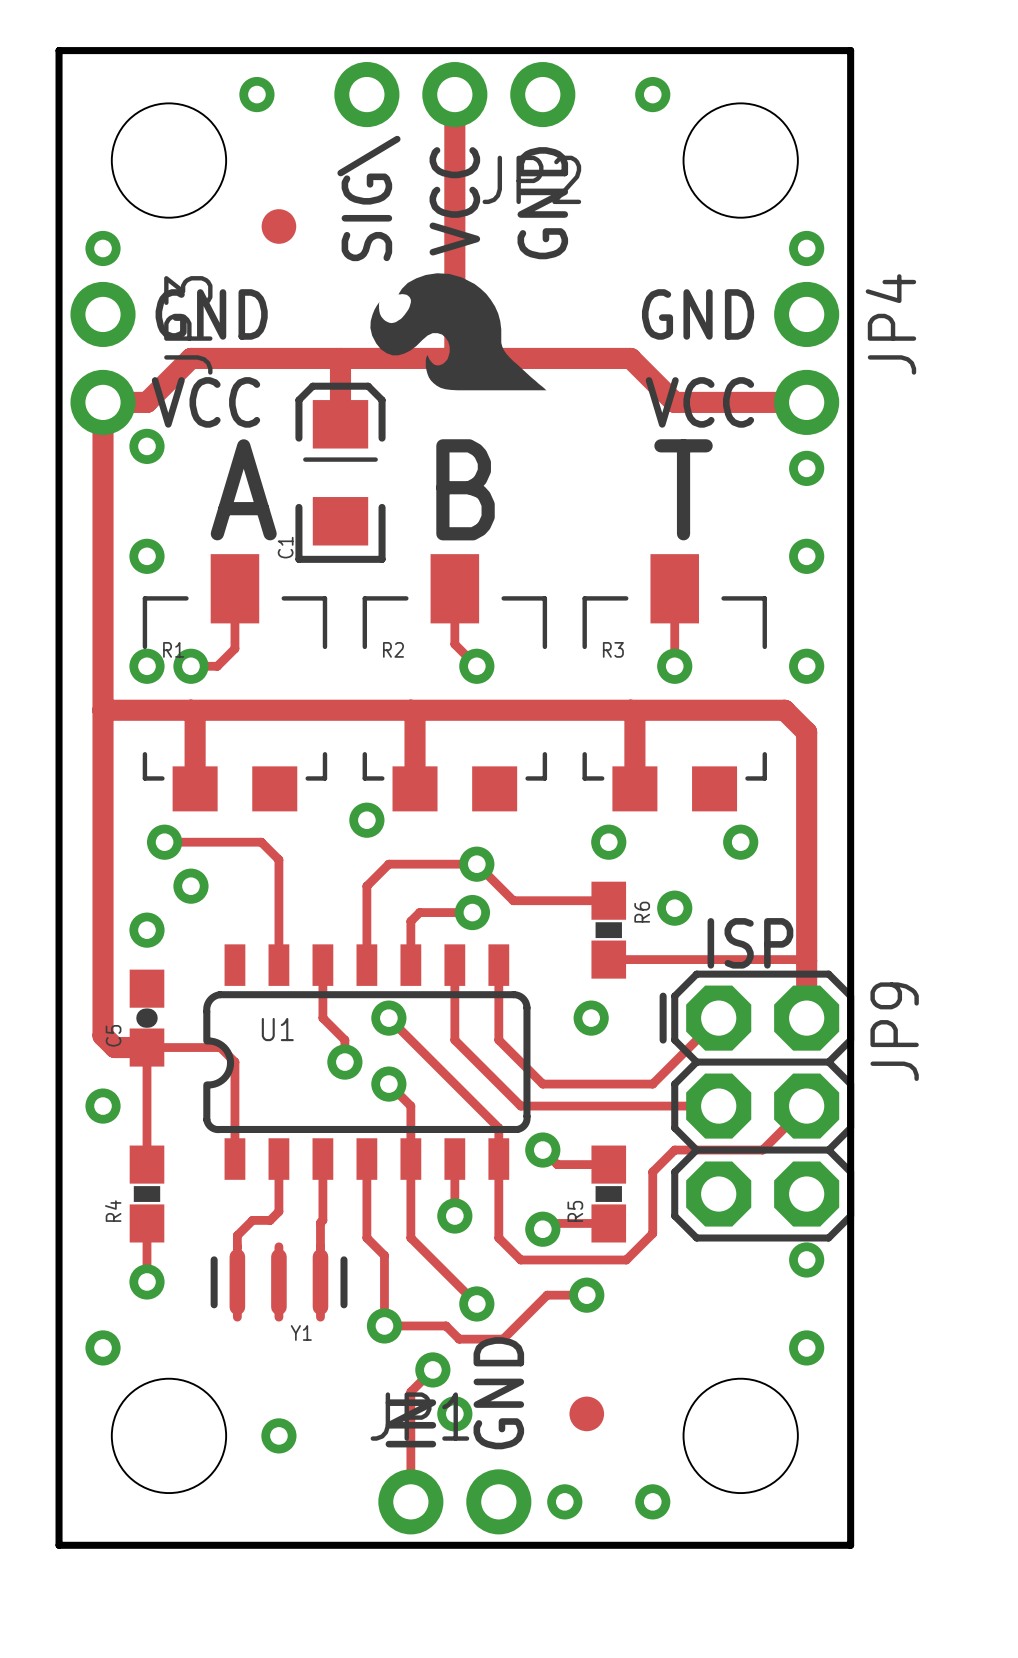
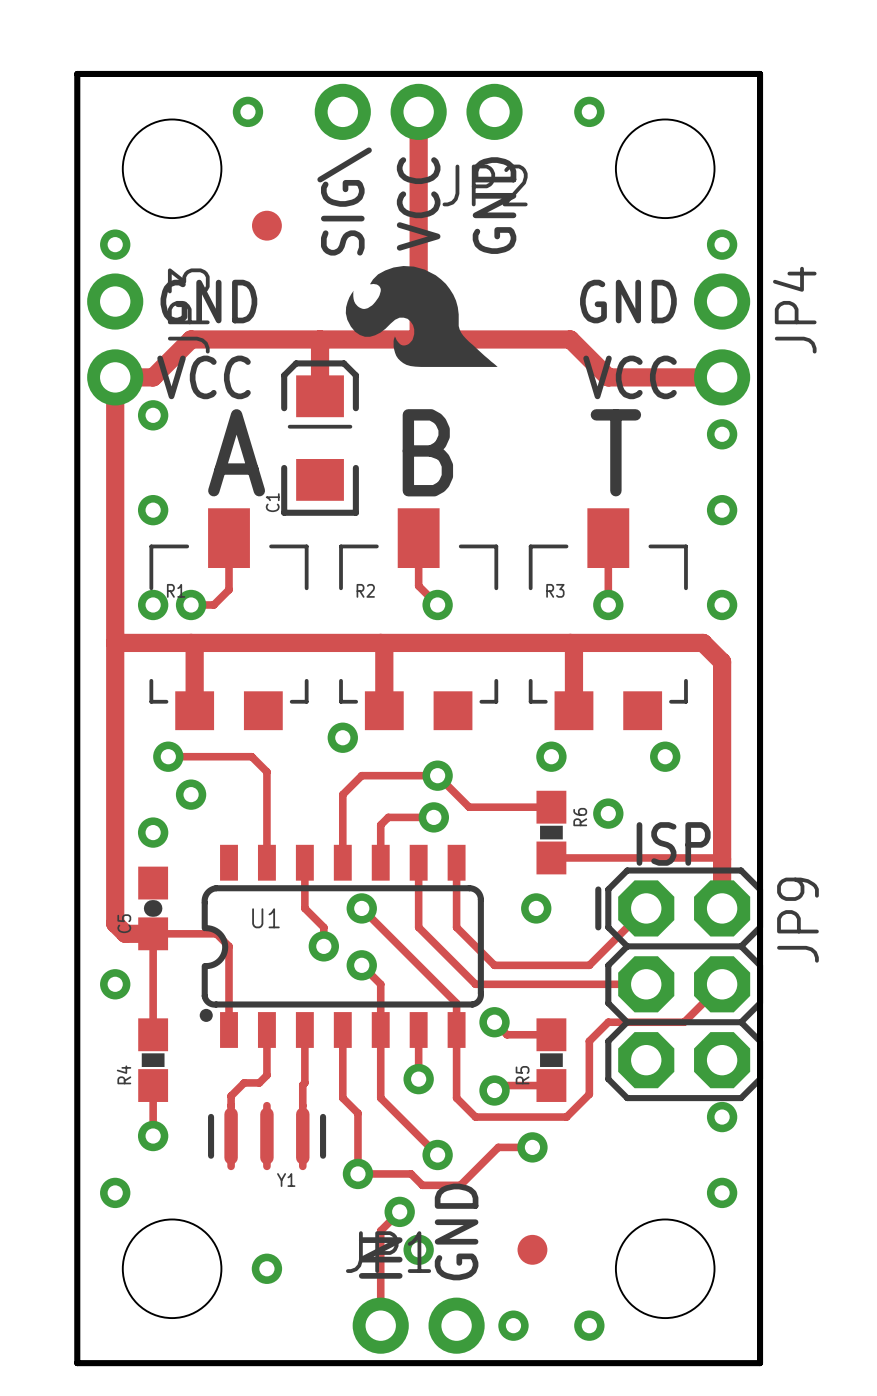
U1 footprint: [203, 944, 531, 1180] -> [199, 844, 485, 1048]

